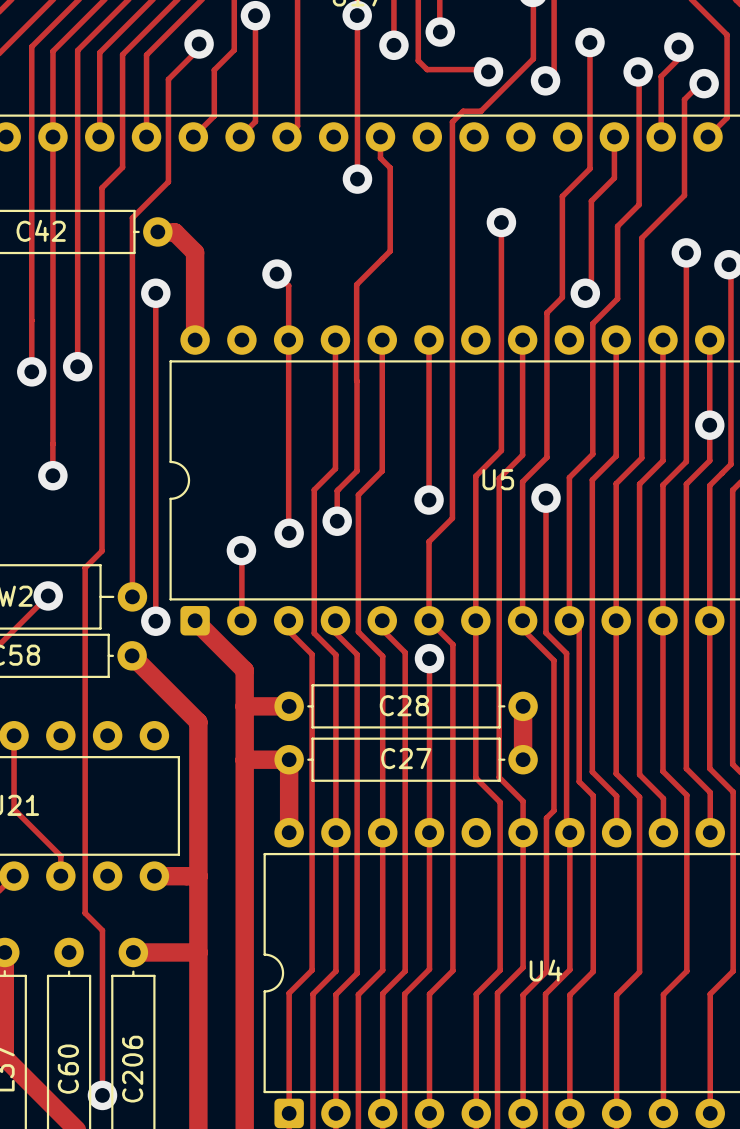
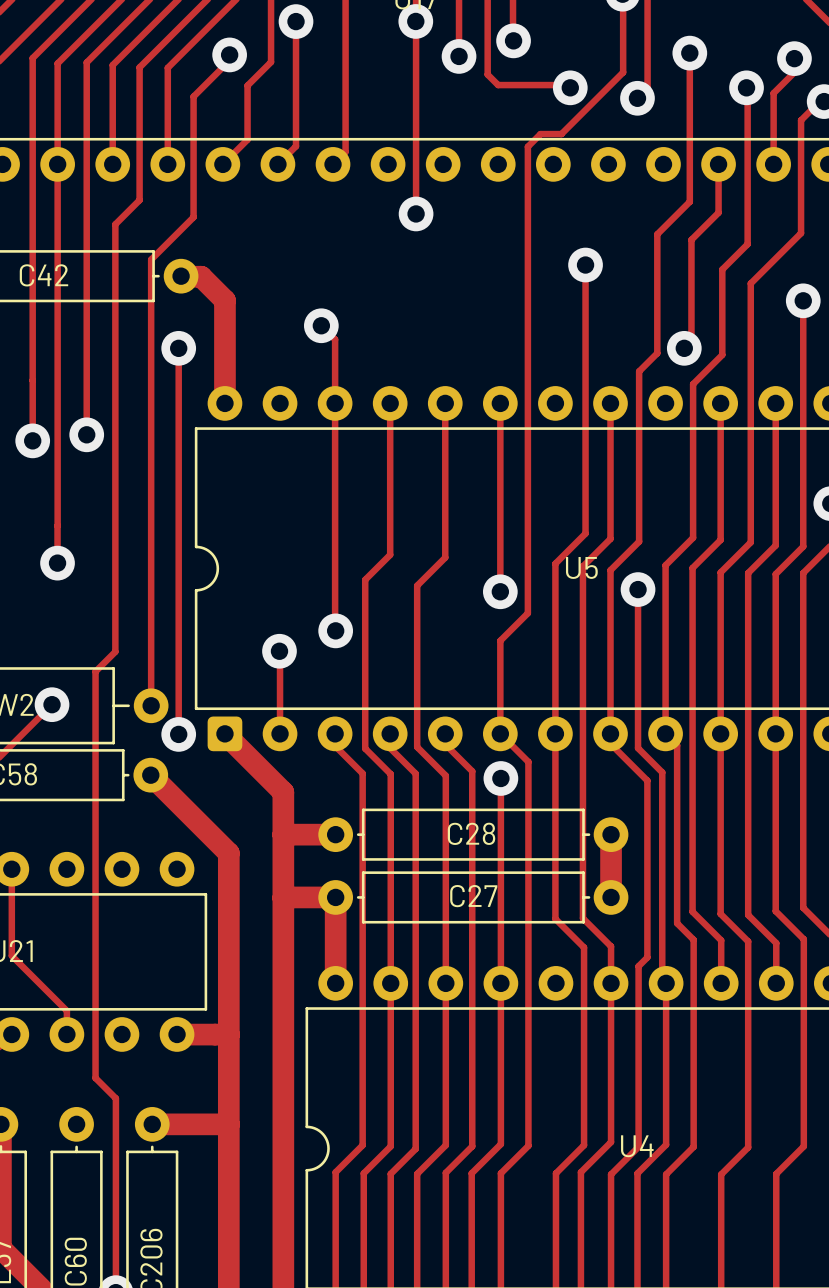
track: (380, 136) (380, 158) (390, 167) (390, 251) (356, 284) (356, 471) (337, 490) (337, 521) -> none
via: (337, 521) -> none

